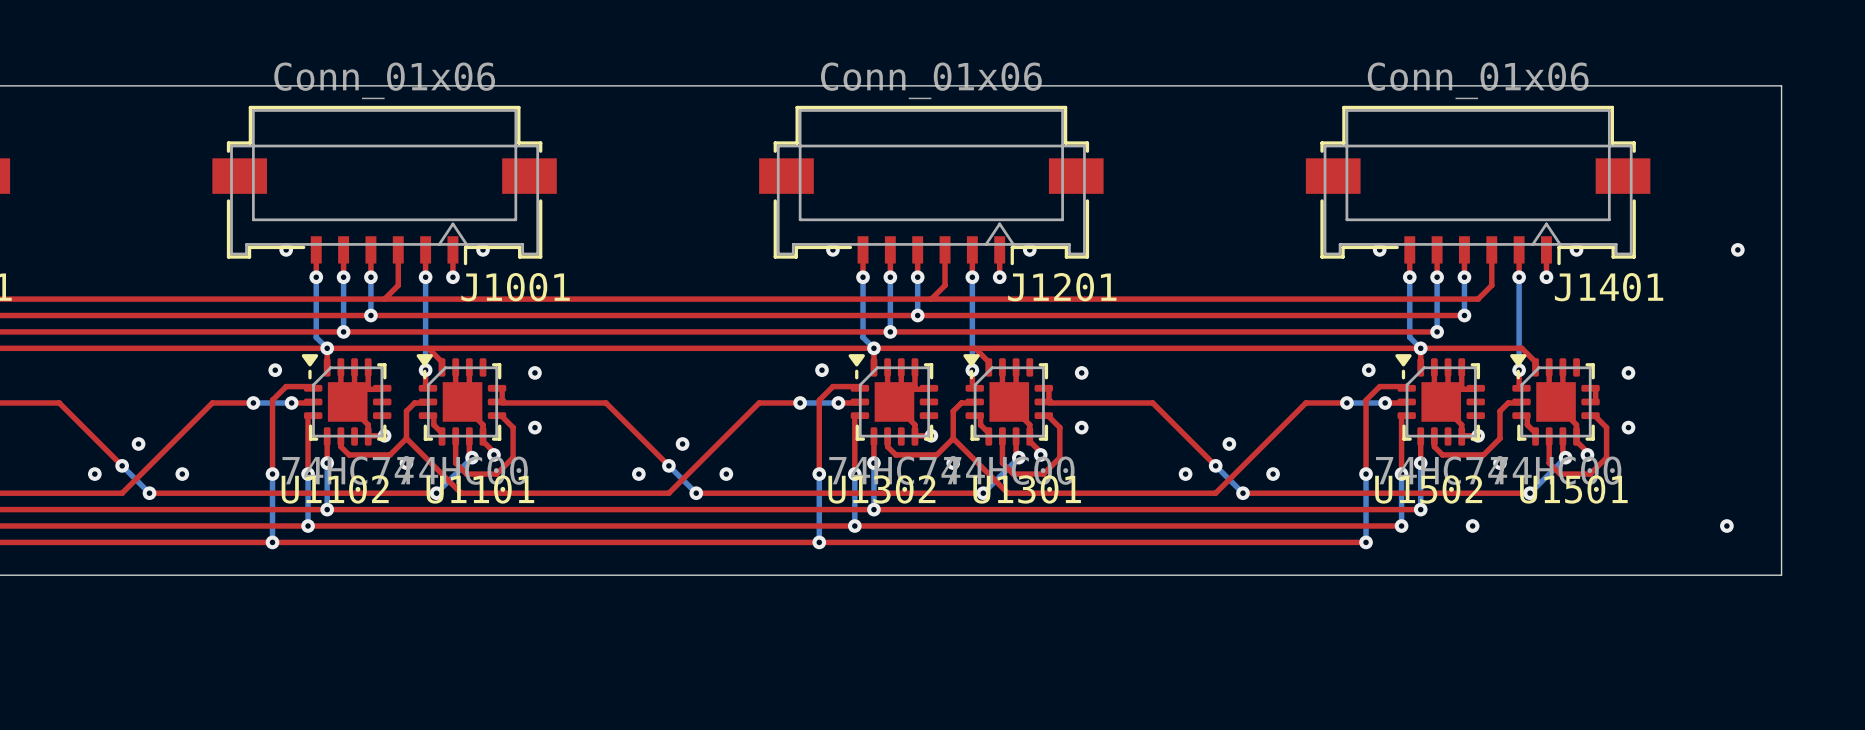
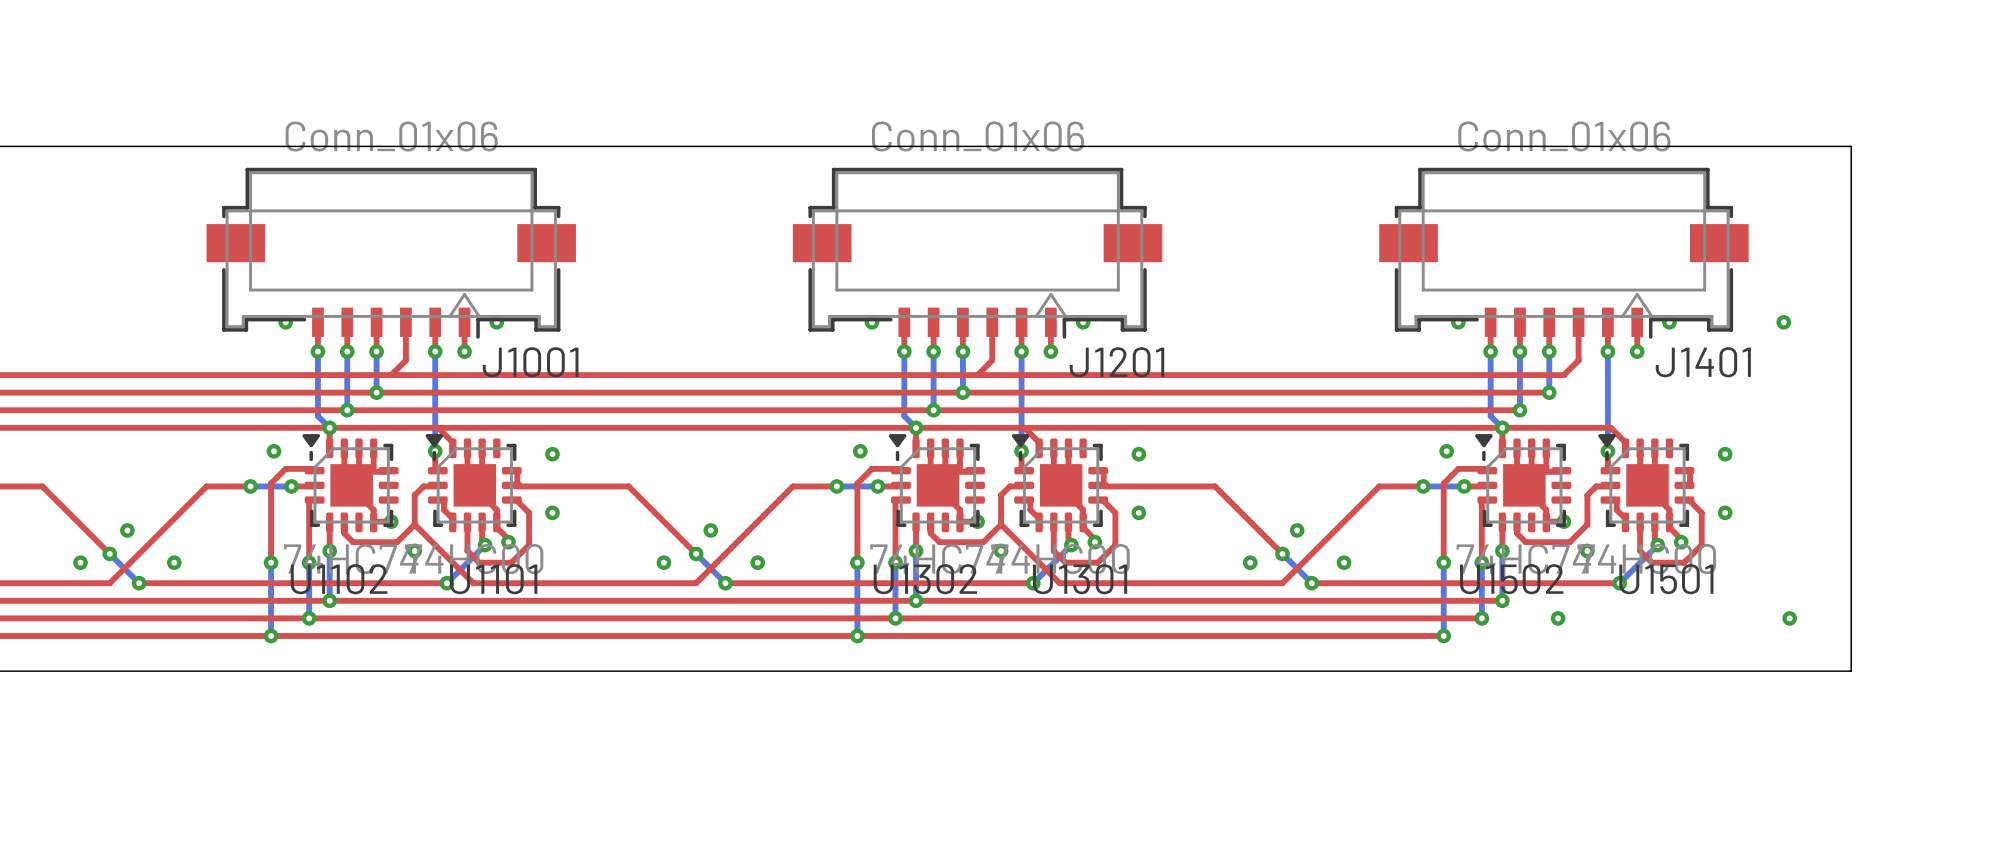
board edge: (1746, 85) (1781, 85) (1781, 575) (1746, 575) -> (1851, 146) (1851, 671)
via position: (1737, 249) -> (1783, 322)
via position: (1726, 526) -> (1789, 618)

